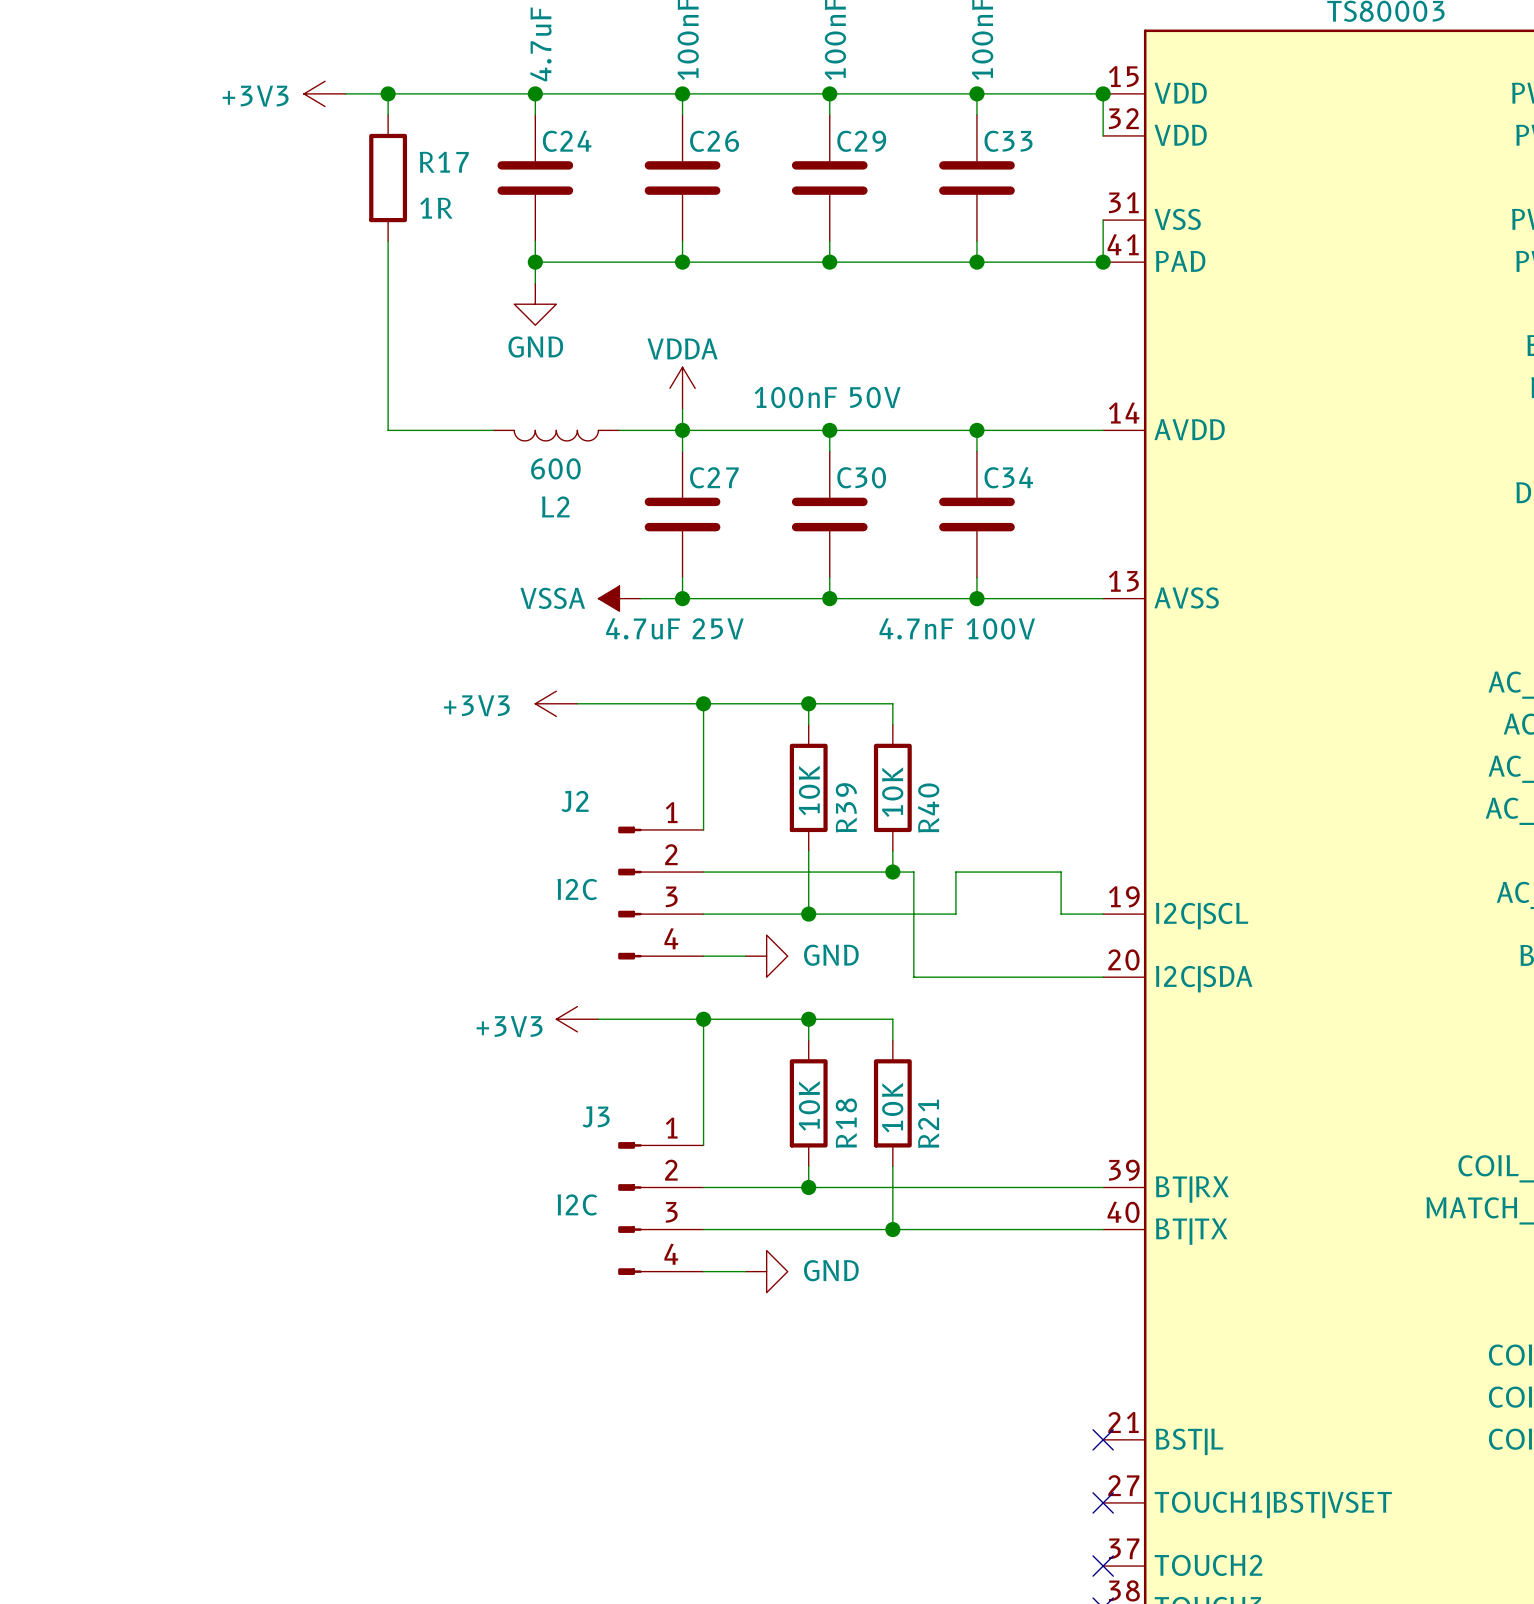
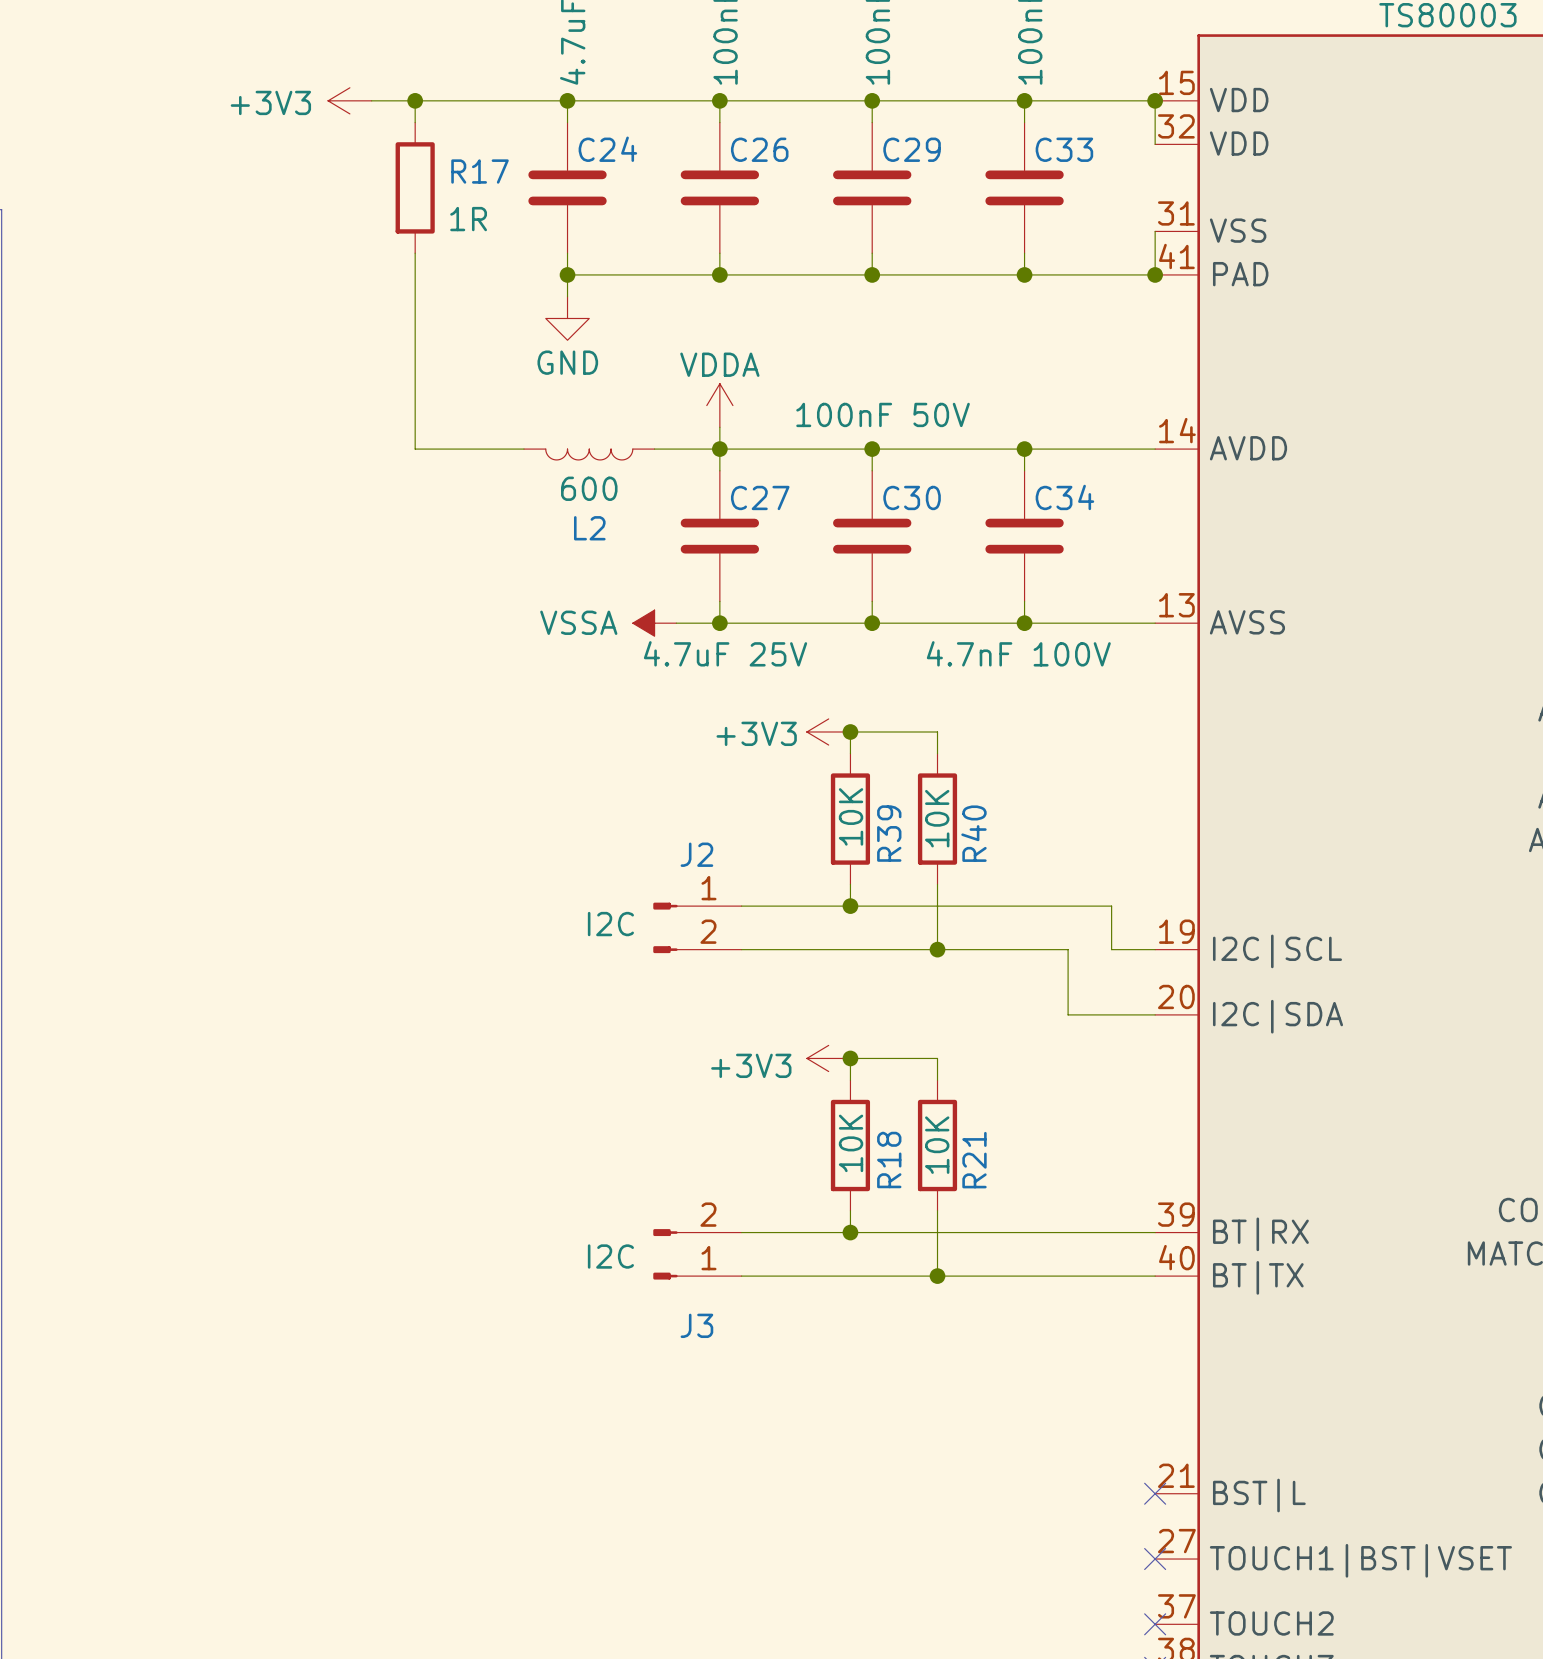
power symbol: +3V3 (556, 703) -> none
wire: (577, 703) (808, 703) -> none
wire: (703, 703) (703, 829) -> none
junction: (703, 703) -> none
power symbol: none -> +3V3 (828, 731)
J2 name position: J2 (575, 801) -> J2 (696, 854)
J2 symbol: [618, 826, 704, 960] -> [653, 902, 742, 954]
wire: (808, 872) (808, 914) -> (937, 906) (937, 949)
junction: none -> (850, 906)
junction: (892, 872) -> none
wire: (913, 872) (913, 977) (1019, 977) -> (1002, 949) (1068, 949) (1068, 1014)
wire: (955, 872) (955, 914) -> (1002, 906) (959, 906)
junction: (808, 914) -> none
junction: none -> (937, 949)
wire: (703, 956) (745, 956) -> none
power symbol: GND (766, 956) -> none
power symbol: +3V3 (577, 1019) -> none
wire: (598, 1019) (808, 1019) -> none
wire: (703, 1019) (703, 1145) -> none
junction: (703, 1019) -> none
power symbol: none -> +3V3 (828, 1058)
J3 name position: J3 (596, 1116) -> J3 (696, 1325)
J3 symbol: [618, 1142, 704, 1275] -> [653, 1229, 742, 1280]
wire: (703, 1271) (745, 1271) -> none
power symbol: GND (766, 1271) -> none

